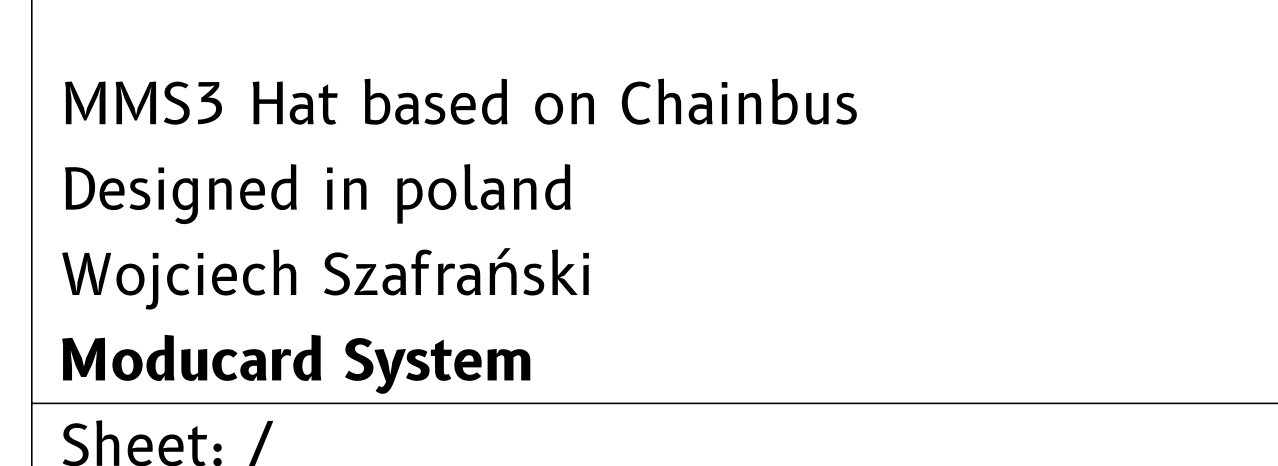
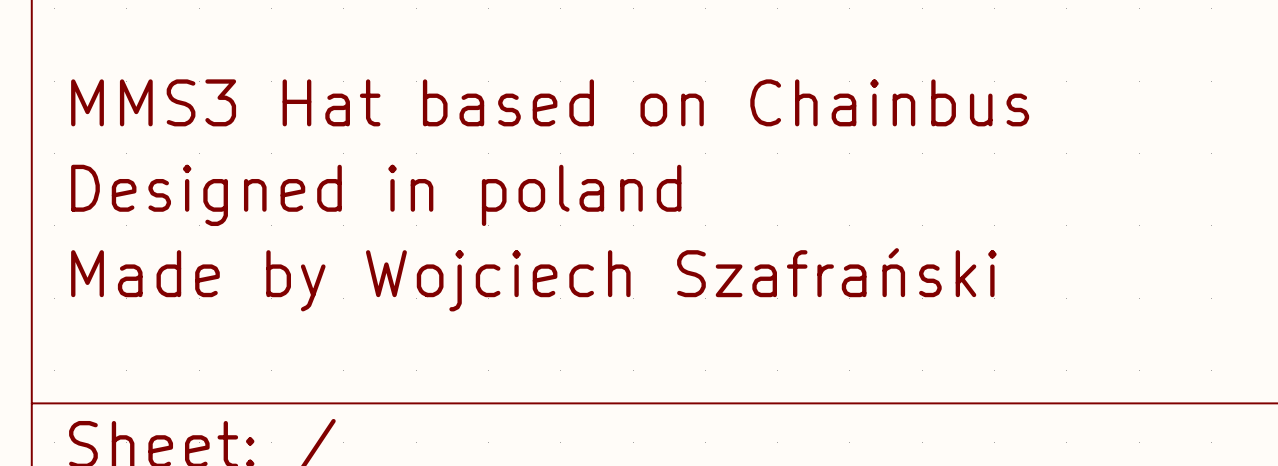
title block: Wojciech Szafrański (325, 278) -> Made by Wojciech Szafrański (533, 279)
title block: Moducard System (296, 364) -> none

